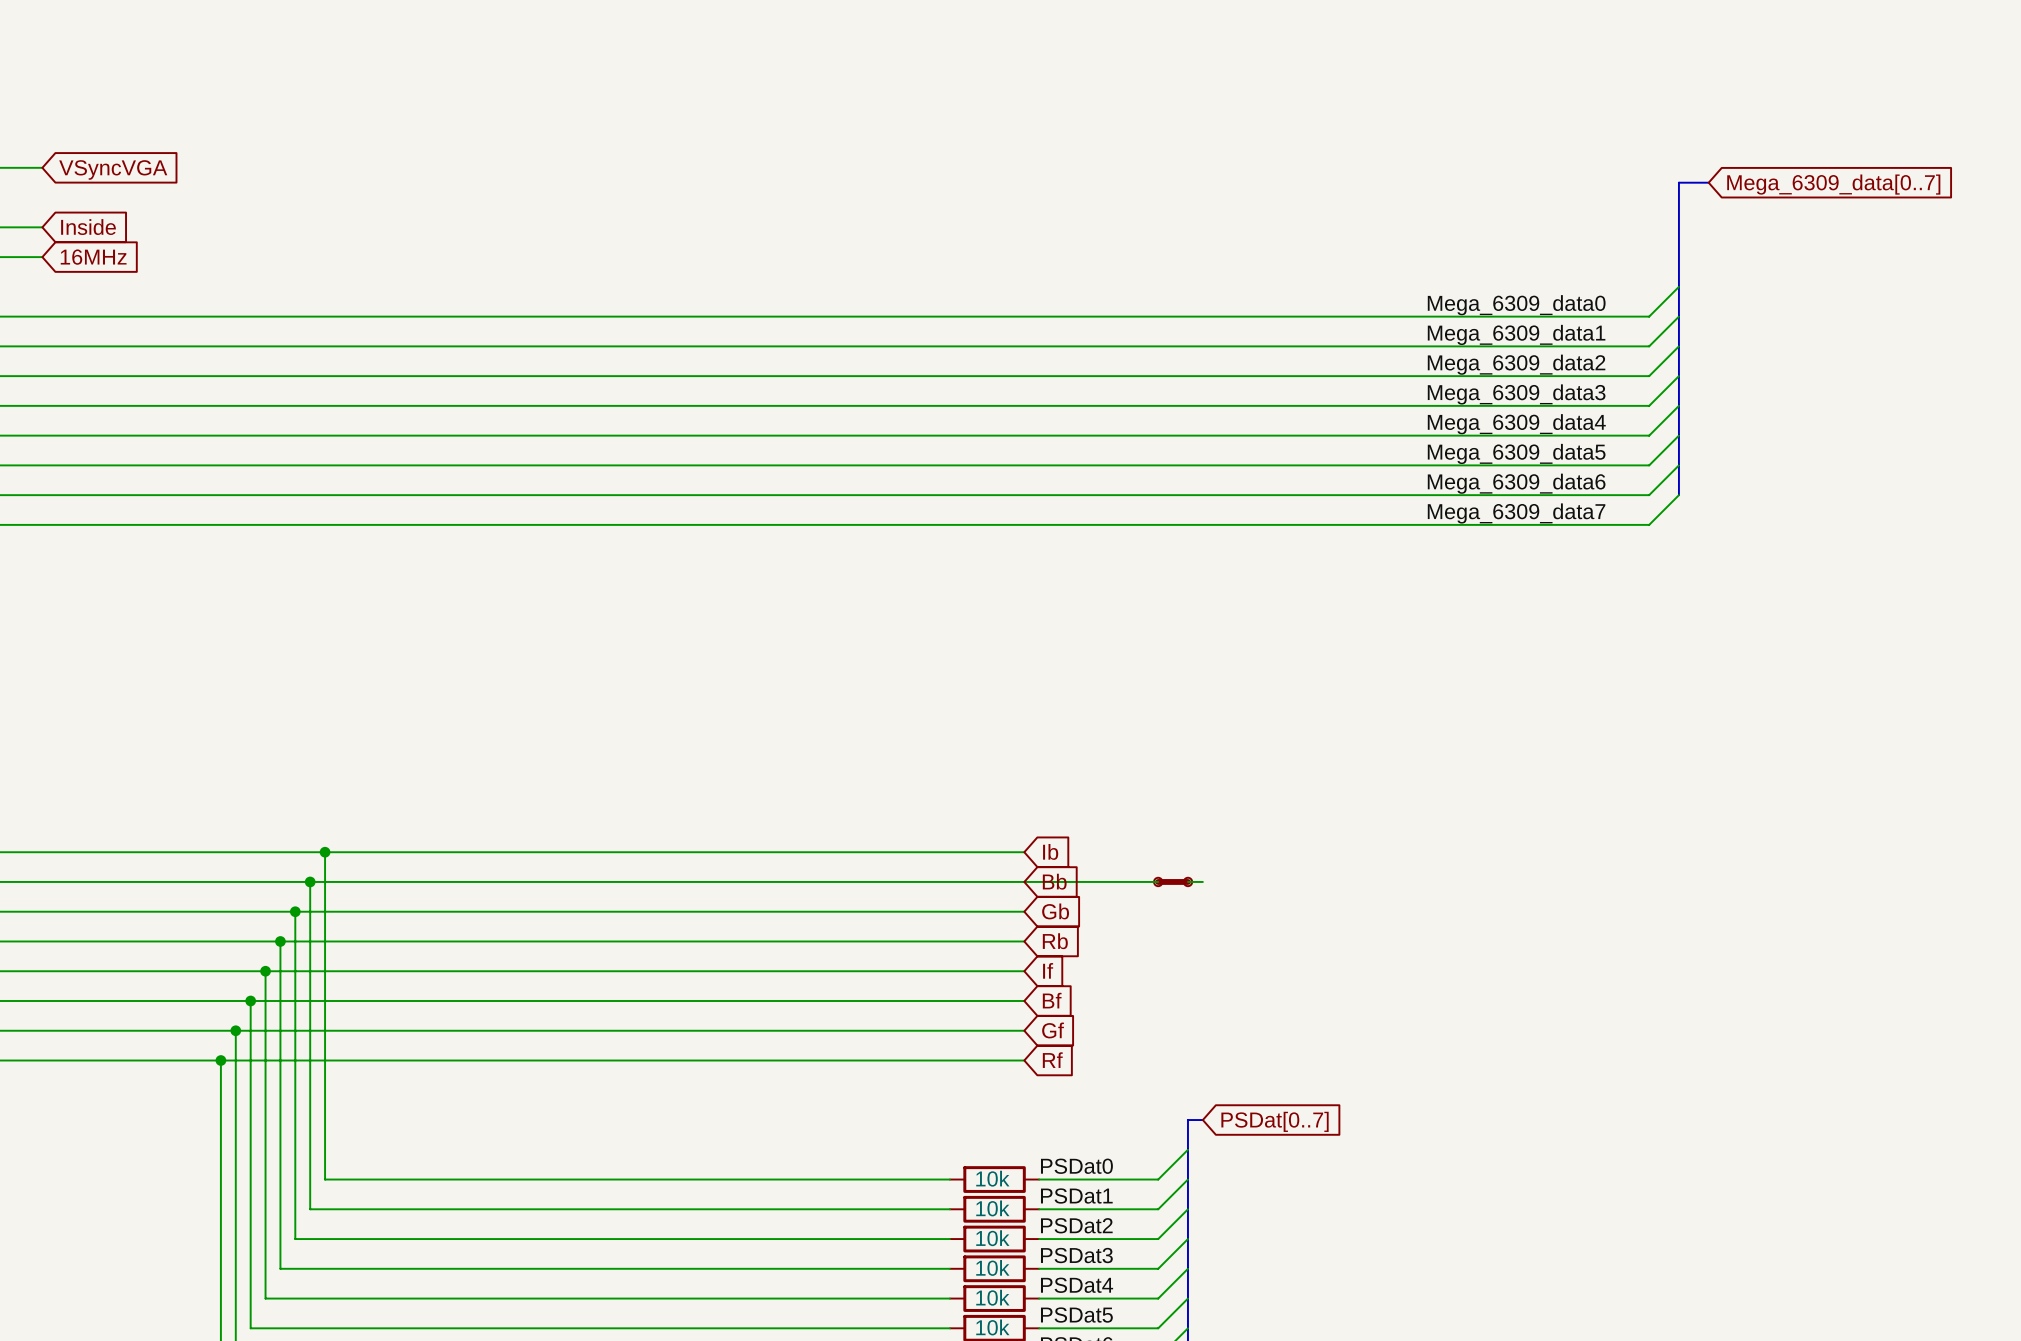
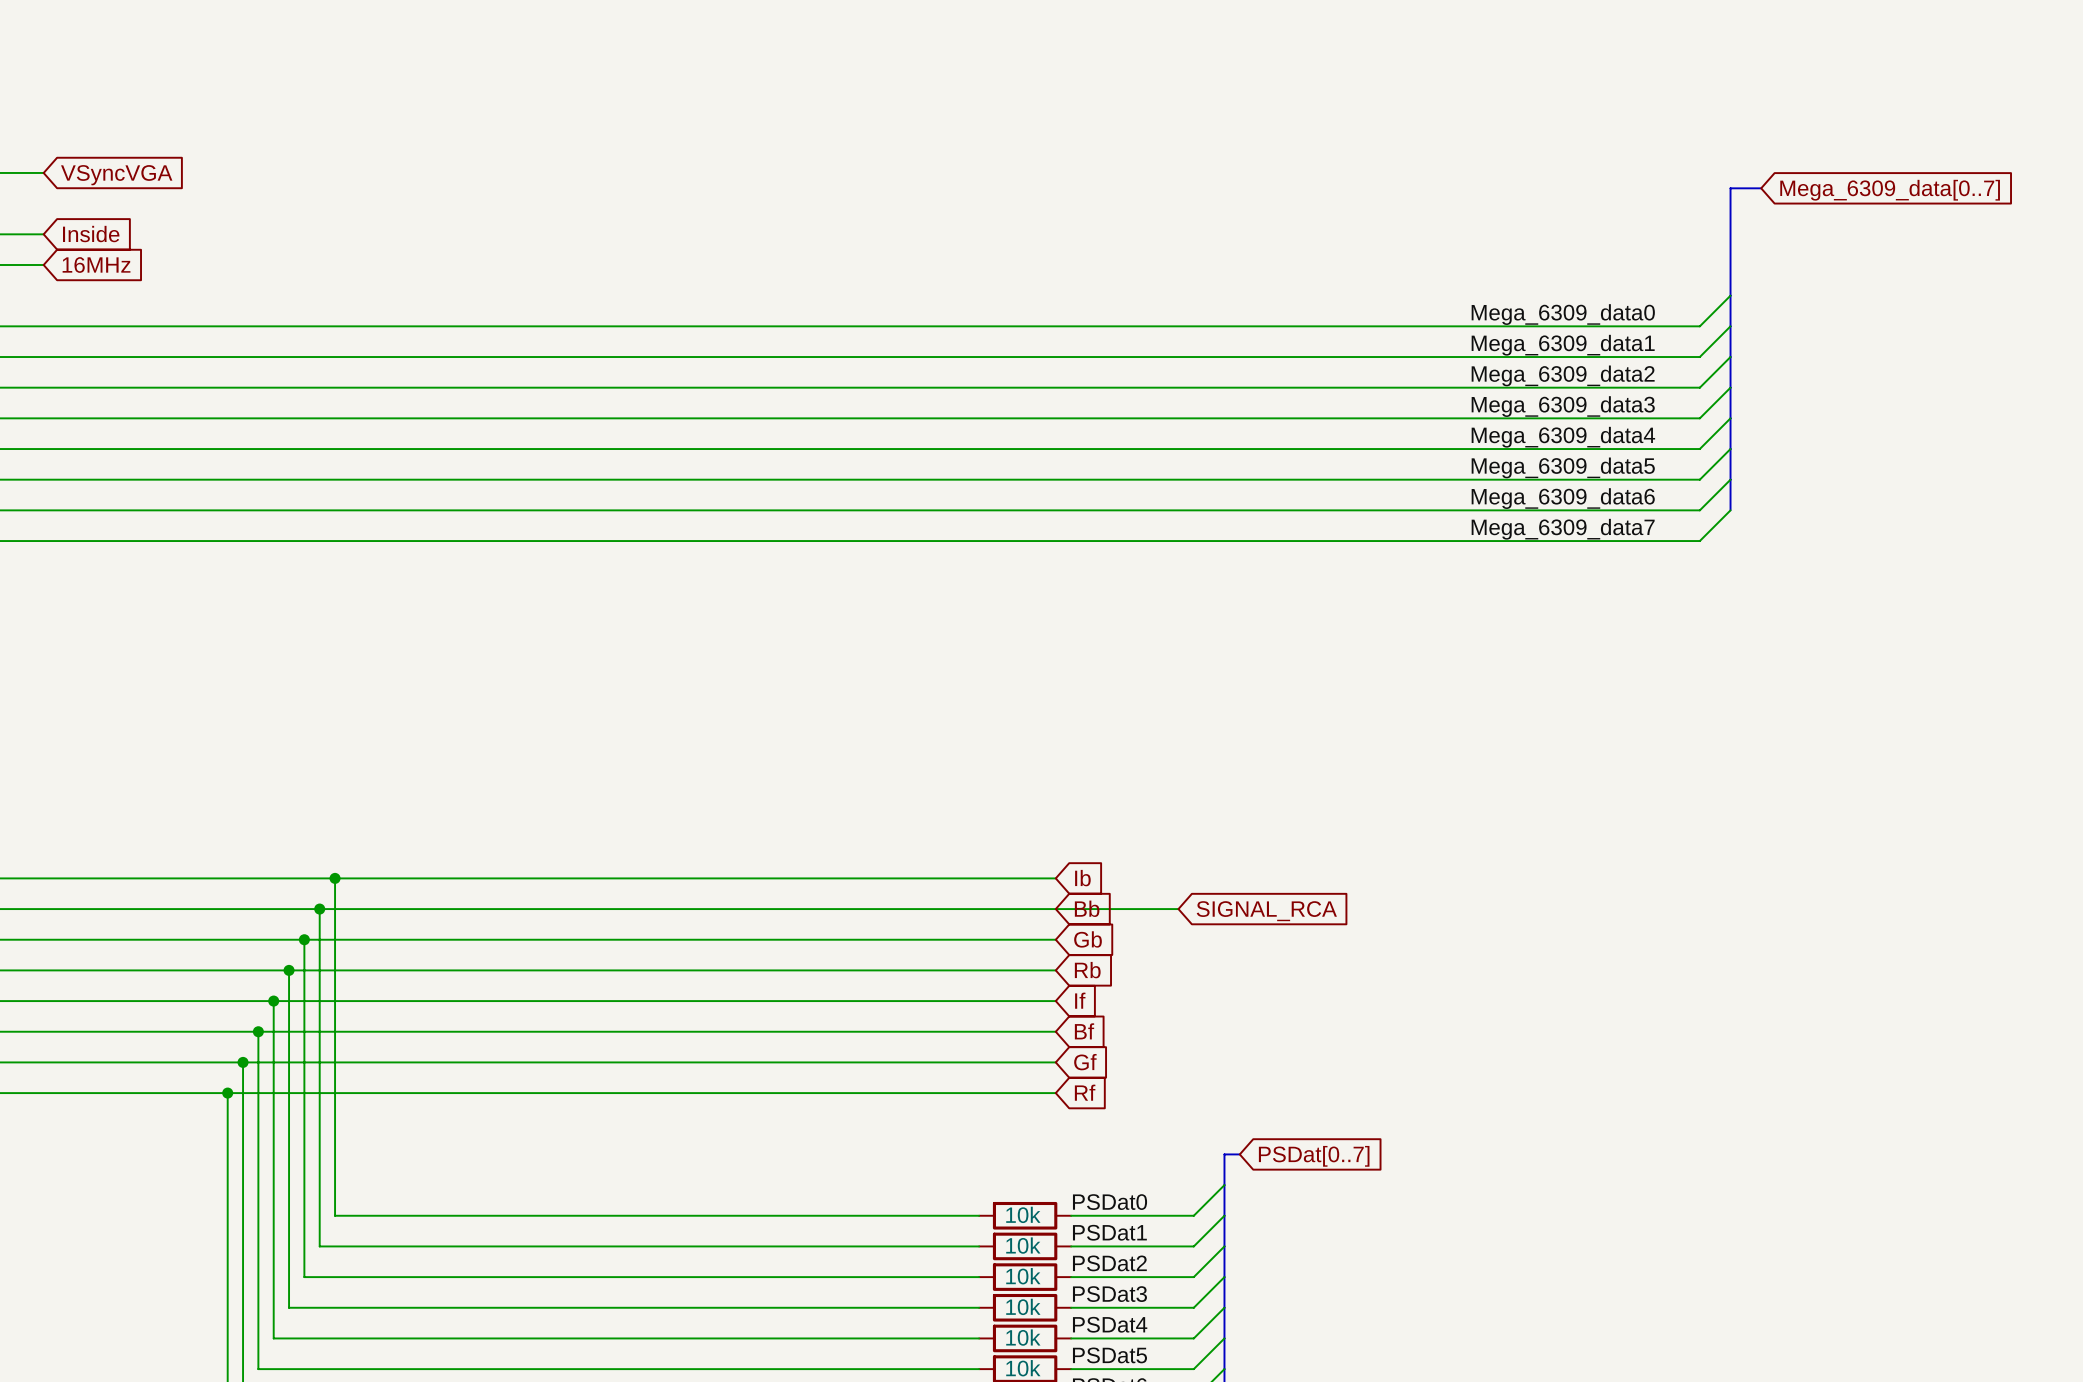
wire: (1143, 881) (1158, 881) -> none
part: (1173, 881) -> none
wire: (1187, 881) (1202, 881) -> none
global label: none -> SIGNAL_RCA (1266, 911)

